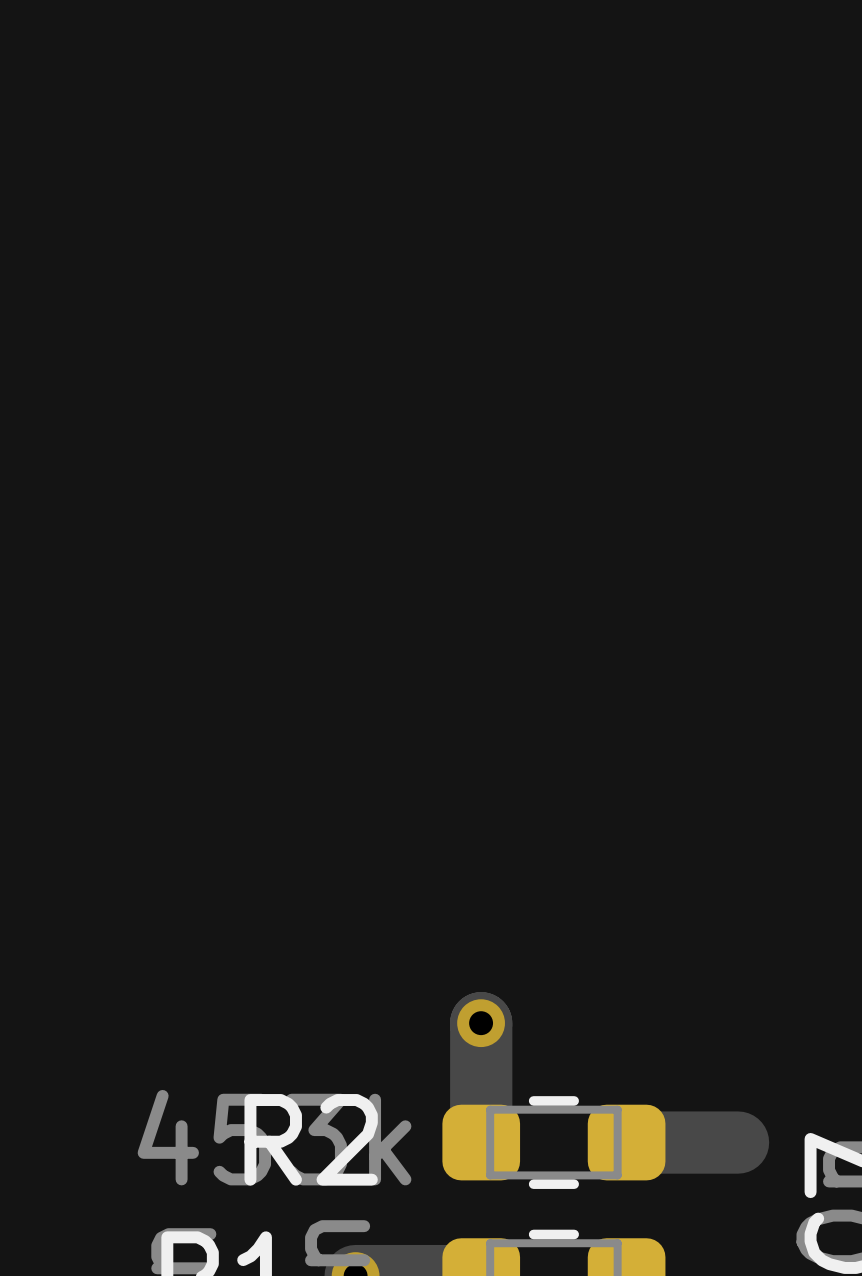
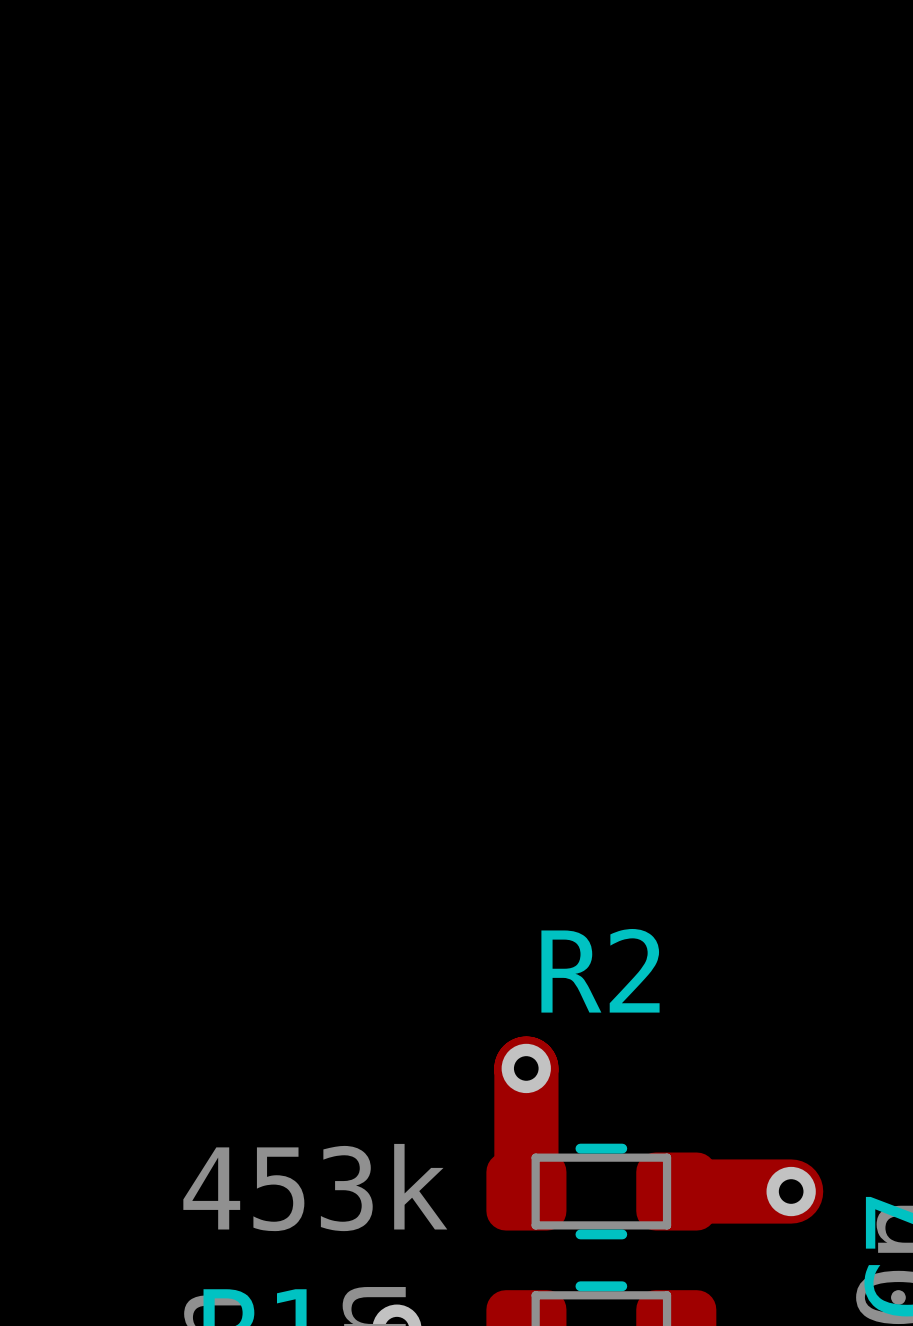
R2 name position: R2 (311, 1139) -> R2 (600, 970)
via: none -> (791, 1191)

